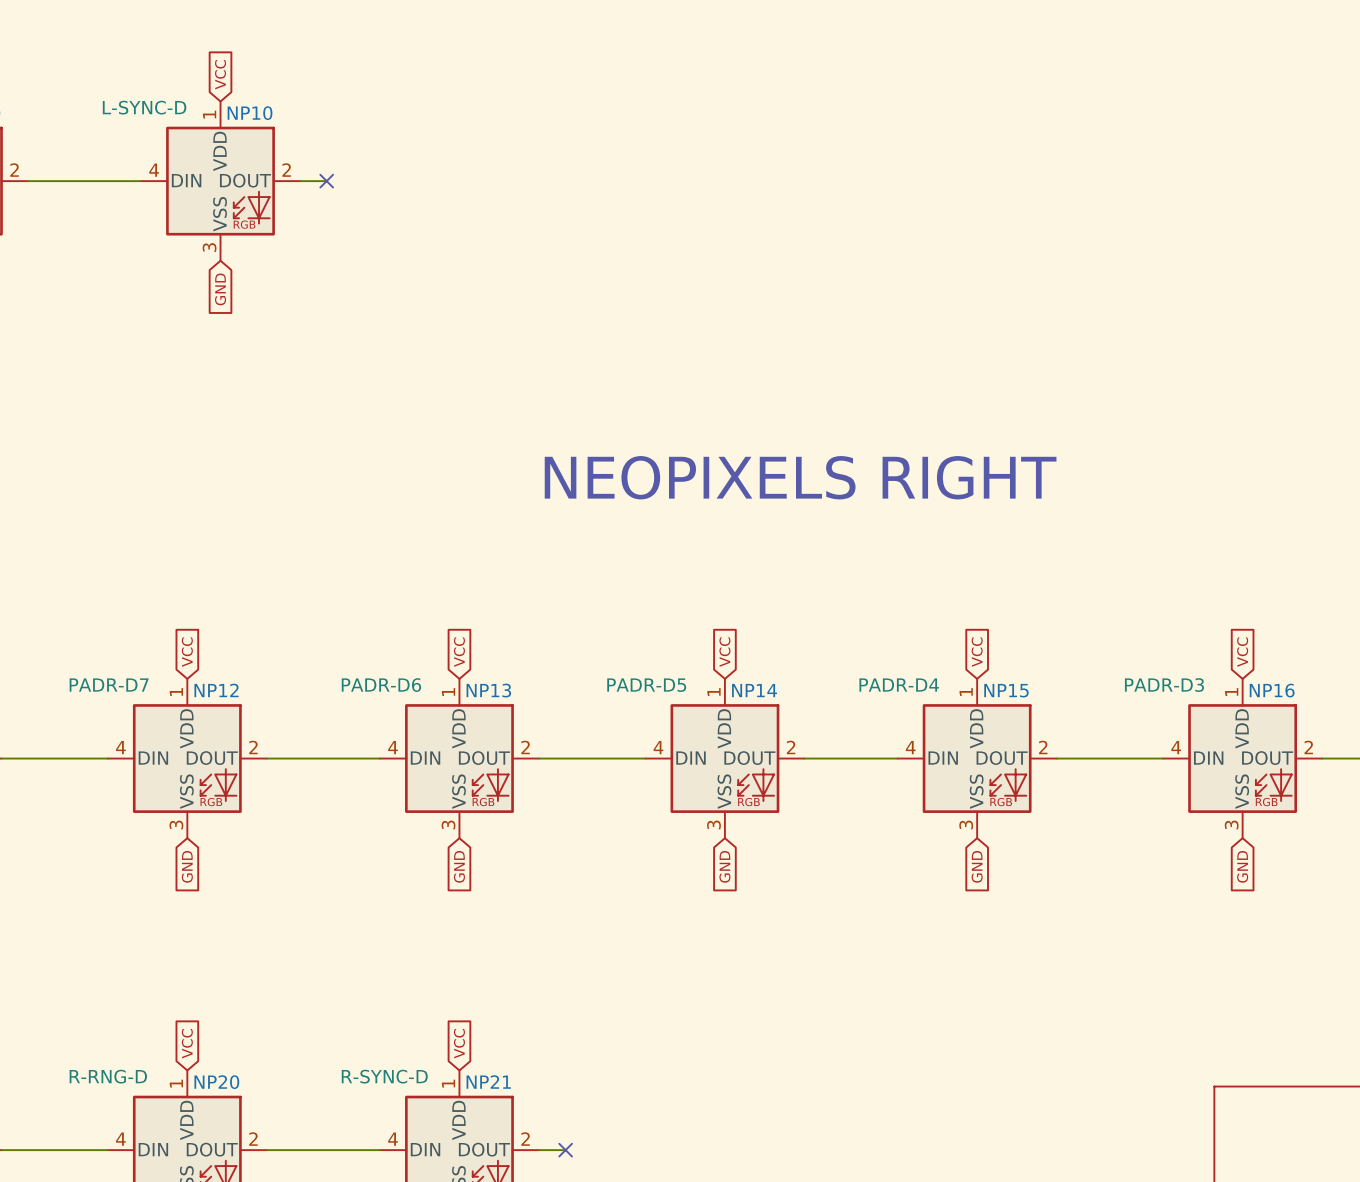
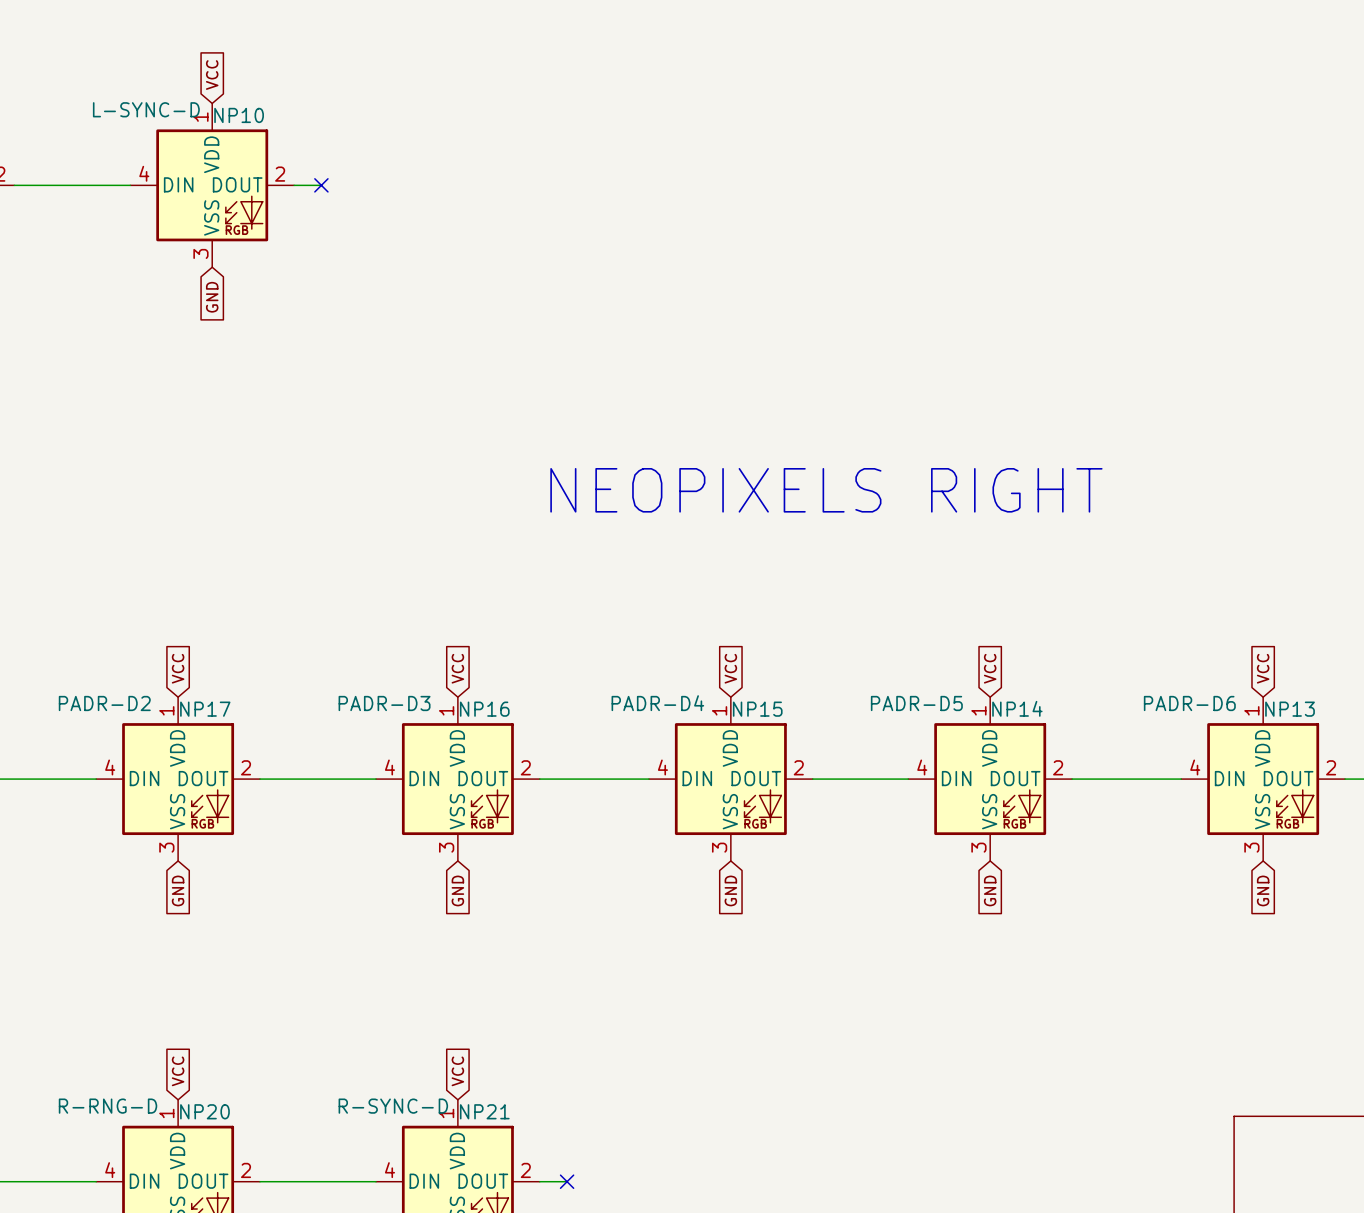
NP12 value: PADR-D7 (109, 685) -> PADR-D2 (104, 703)
NP13 value: PADR-D6 (381, 685) -> PADR-D3 (384, 703)
NP14 value: PADR-D5 (646, 685) -> PADR-D4 (657, 703)
NP15 value: PADR-D4 (899, 685) -> PADR-D5 (916, 703)
NP16 value: PADR-D3 (1164, 685) -> PADR-D6 (1189, 703)
NP12 name: NP12 (216, 690) -> NP17 (205, 709)
NP13 name: NP13 (488, 690) -> NP16 (484, 709)
NP14 name: NP14 (754, 690) -> NP15 (757, 709)
NP15 name: NP15 (1006, 690) -> NP14 (1017, 708)
NP16 name: NP16 (1272, 690) -> NP13 (1290, 709)

